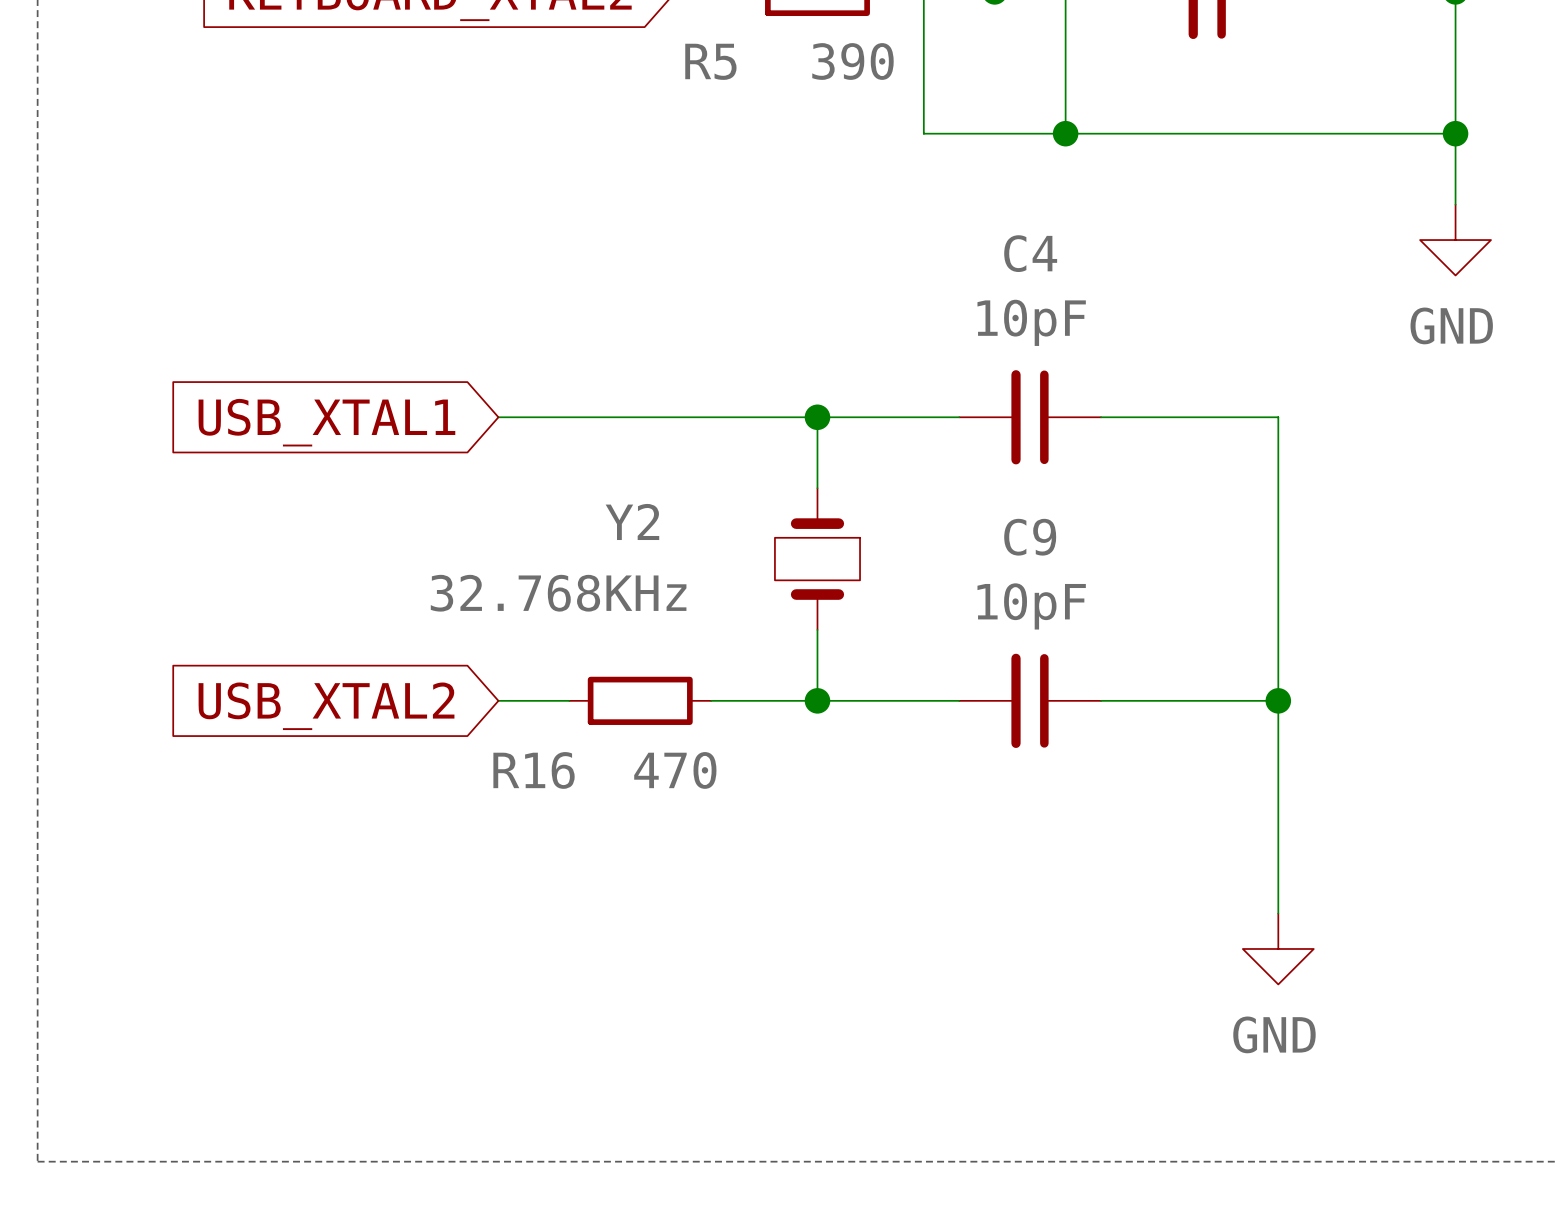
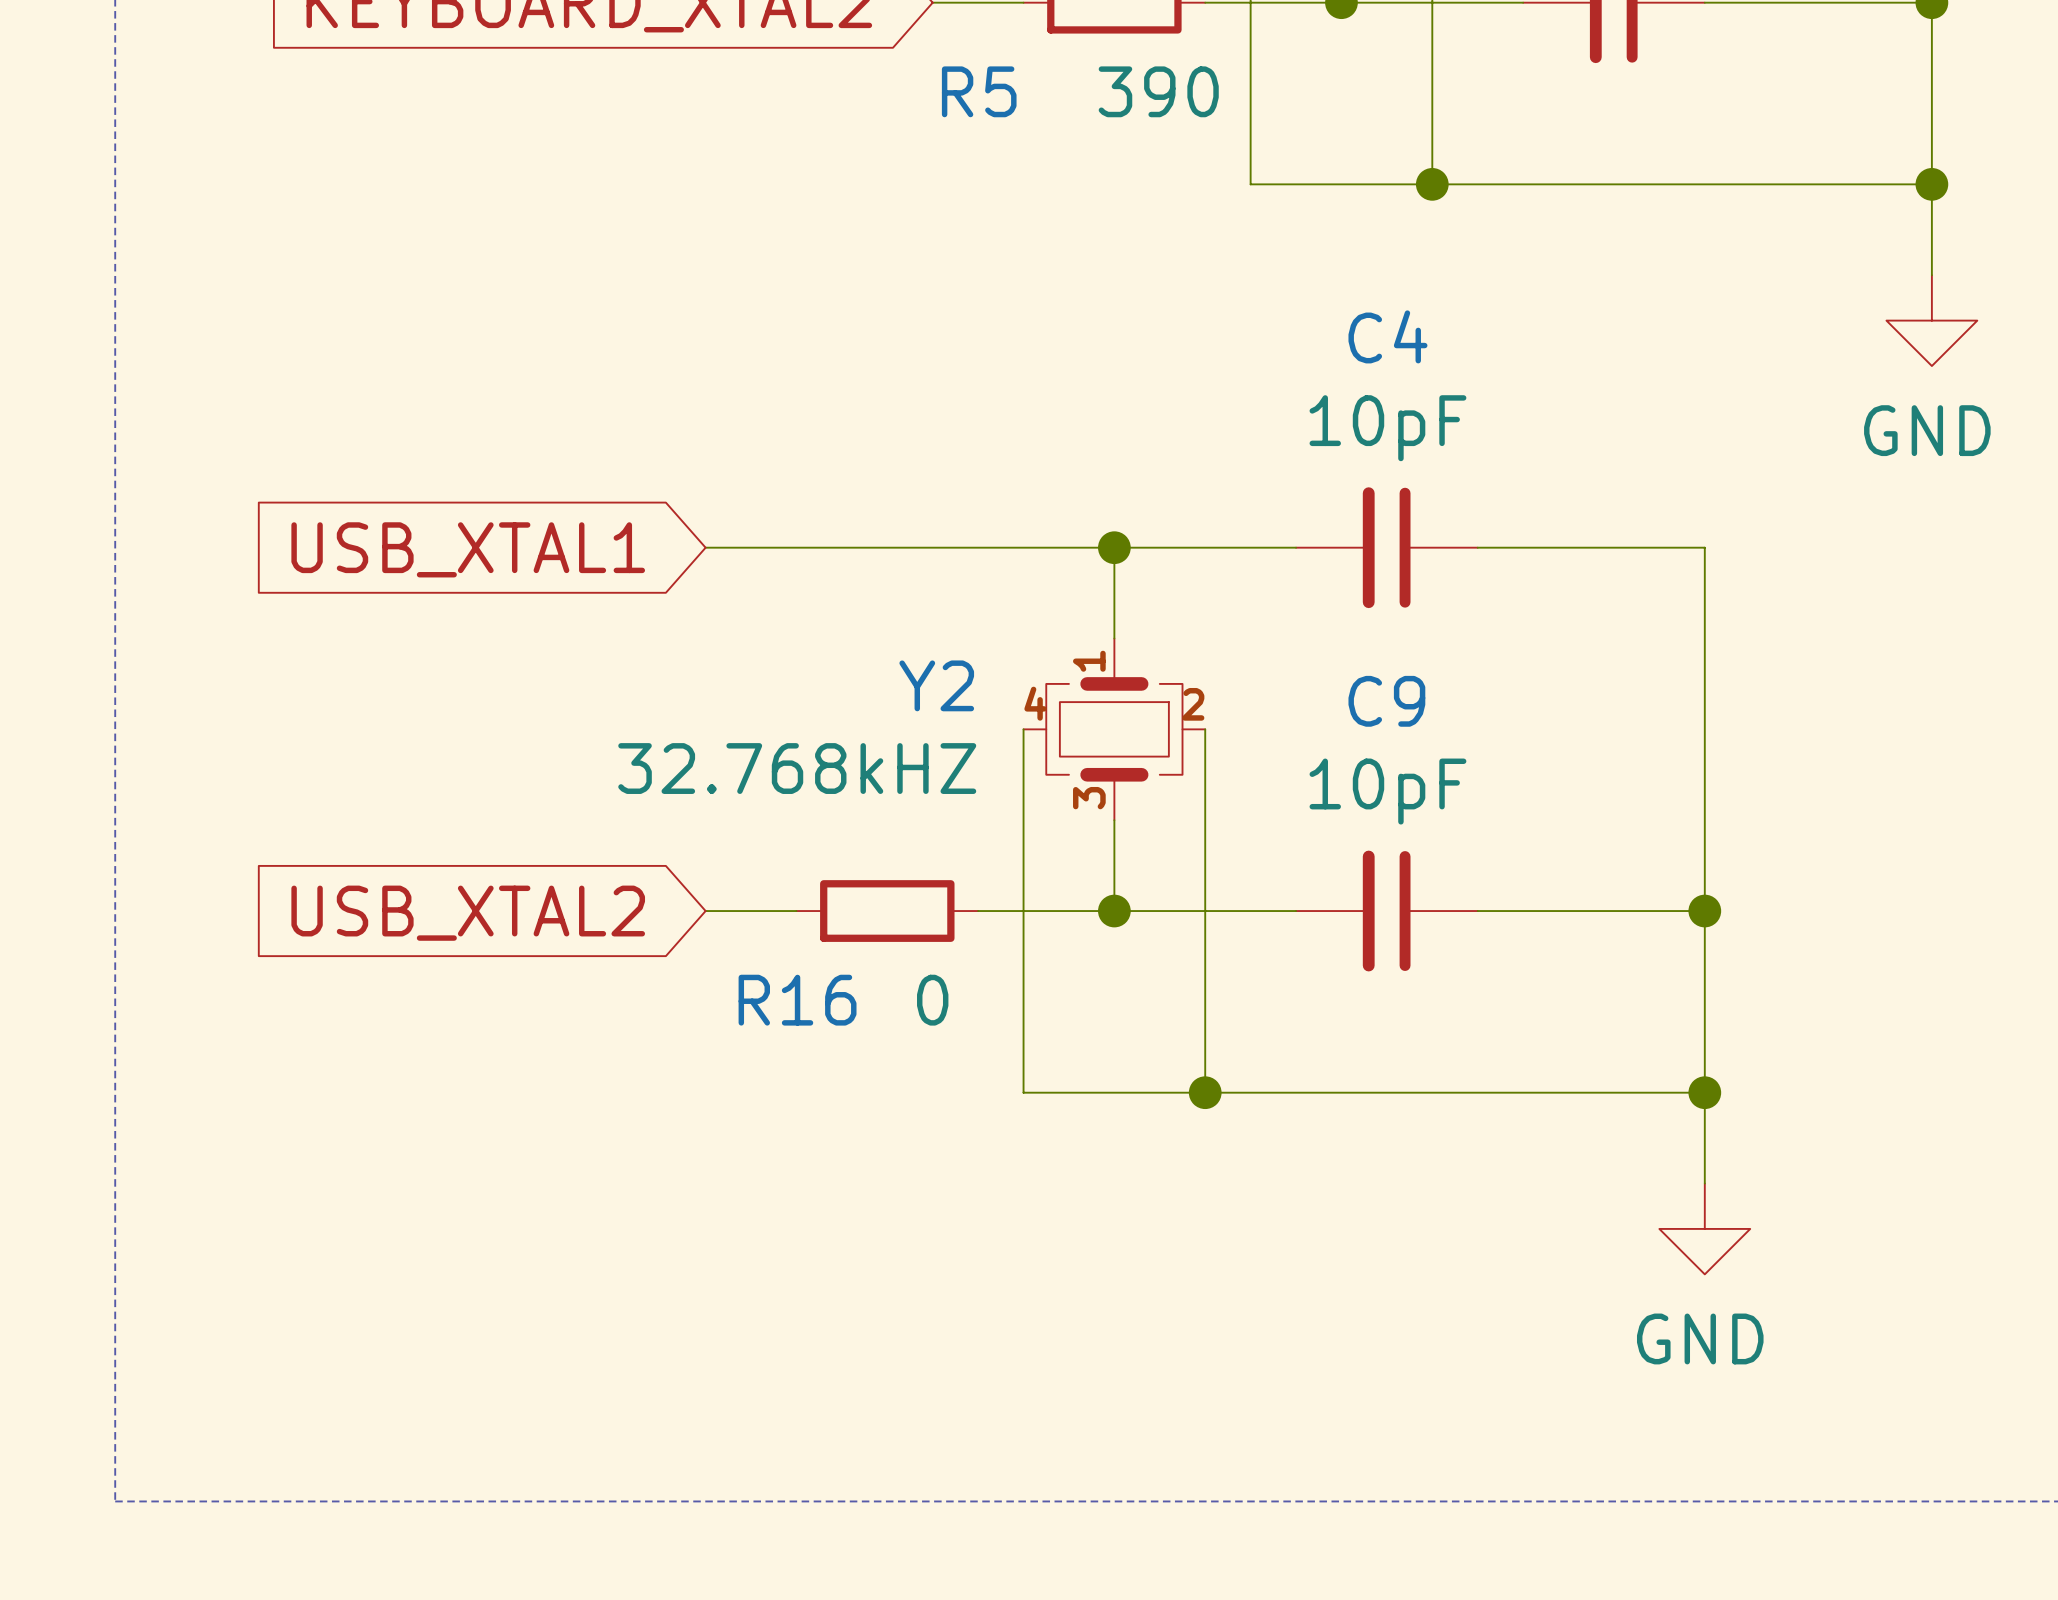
Y2 symbol: [774, 488, 861, 630] -> [1023, 638, 1206, 821]
wire: none -> (1023, 729) (1023, 1092) (1704, 1092)
wire: none -> (1205, 729) (1205, 1092)
Y2 value: 32.768KHz (558, 593) -> 32.768kHZ (797, 768)
R16 name position: R16 (534, 770) -> R16 (797, 1000)
R16 value: 470 (675, 770) -> 0 (932, 1000)
junction: none -> (1205, 1092)
junction: none -> (1704, 1092)

